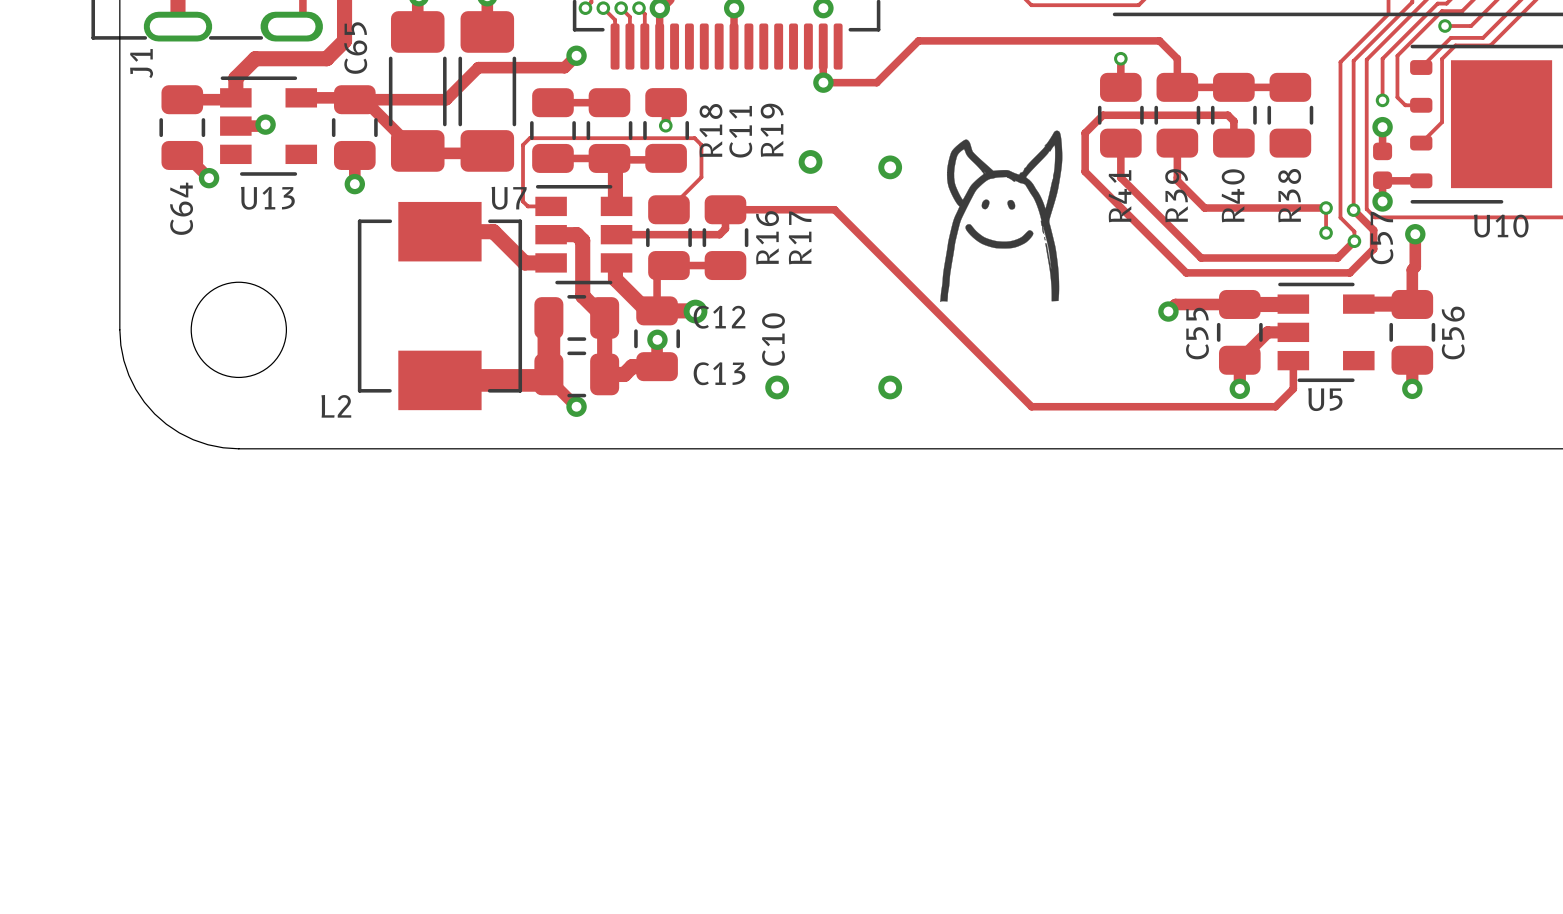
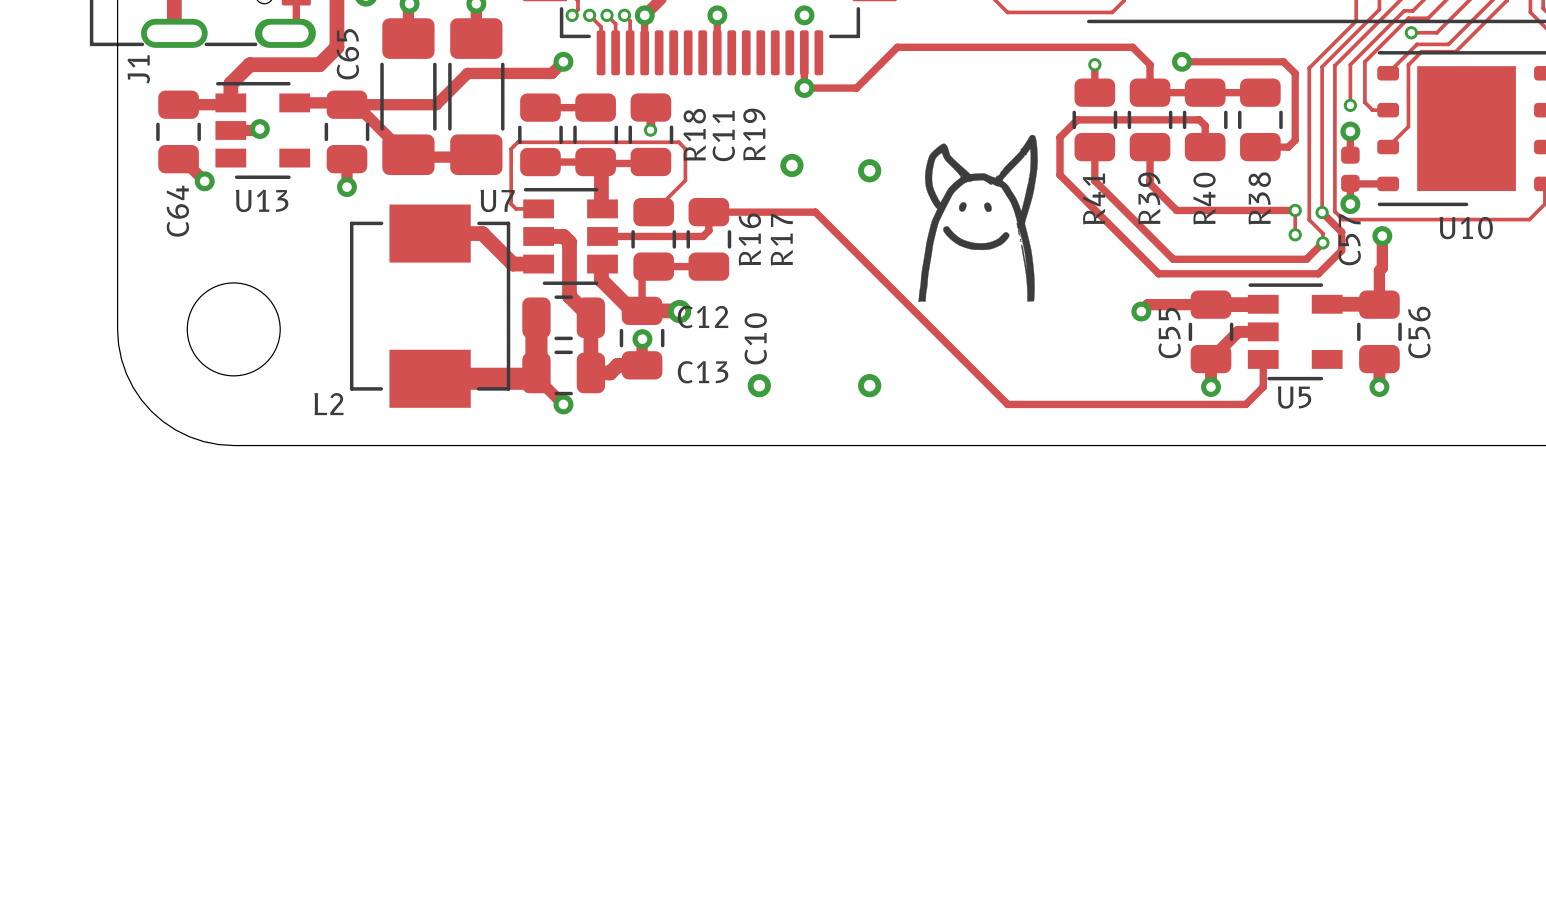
track: none -> (1181, 61) (1283, 61) (1295, 73) (1295, 140) (1288, 147) (1260, 147)
via: none -> (1181, 61)

